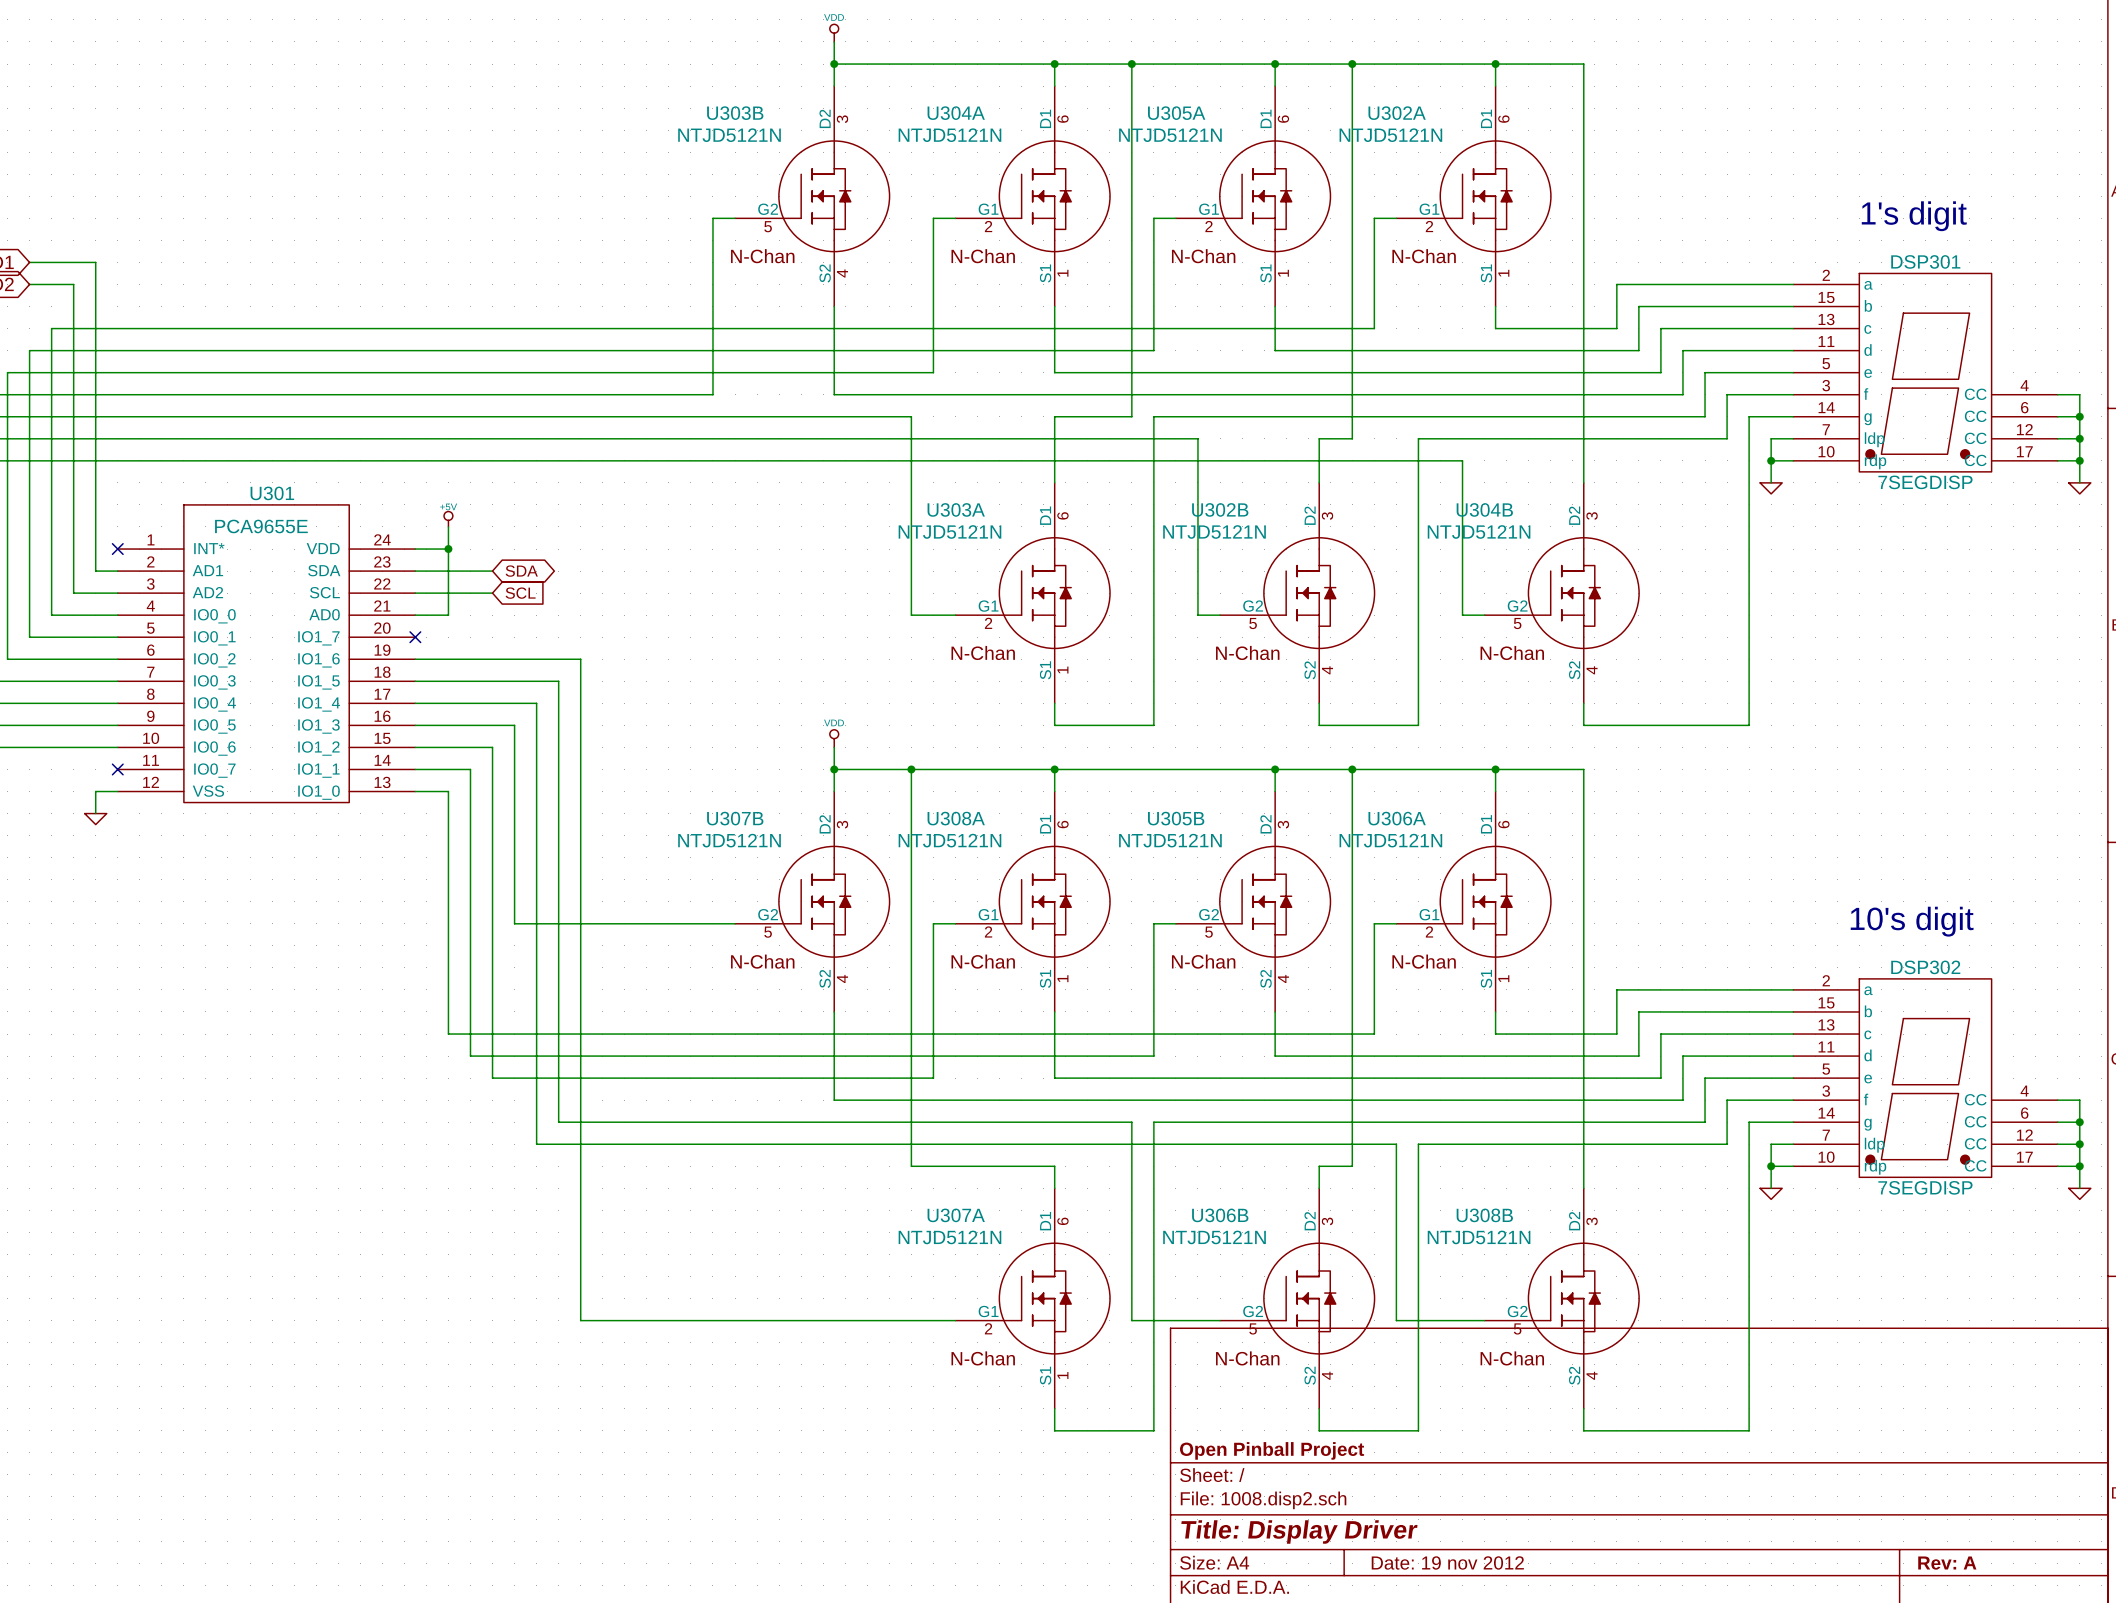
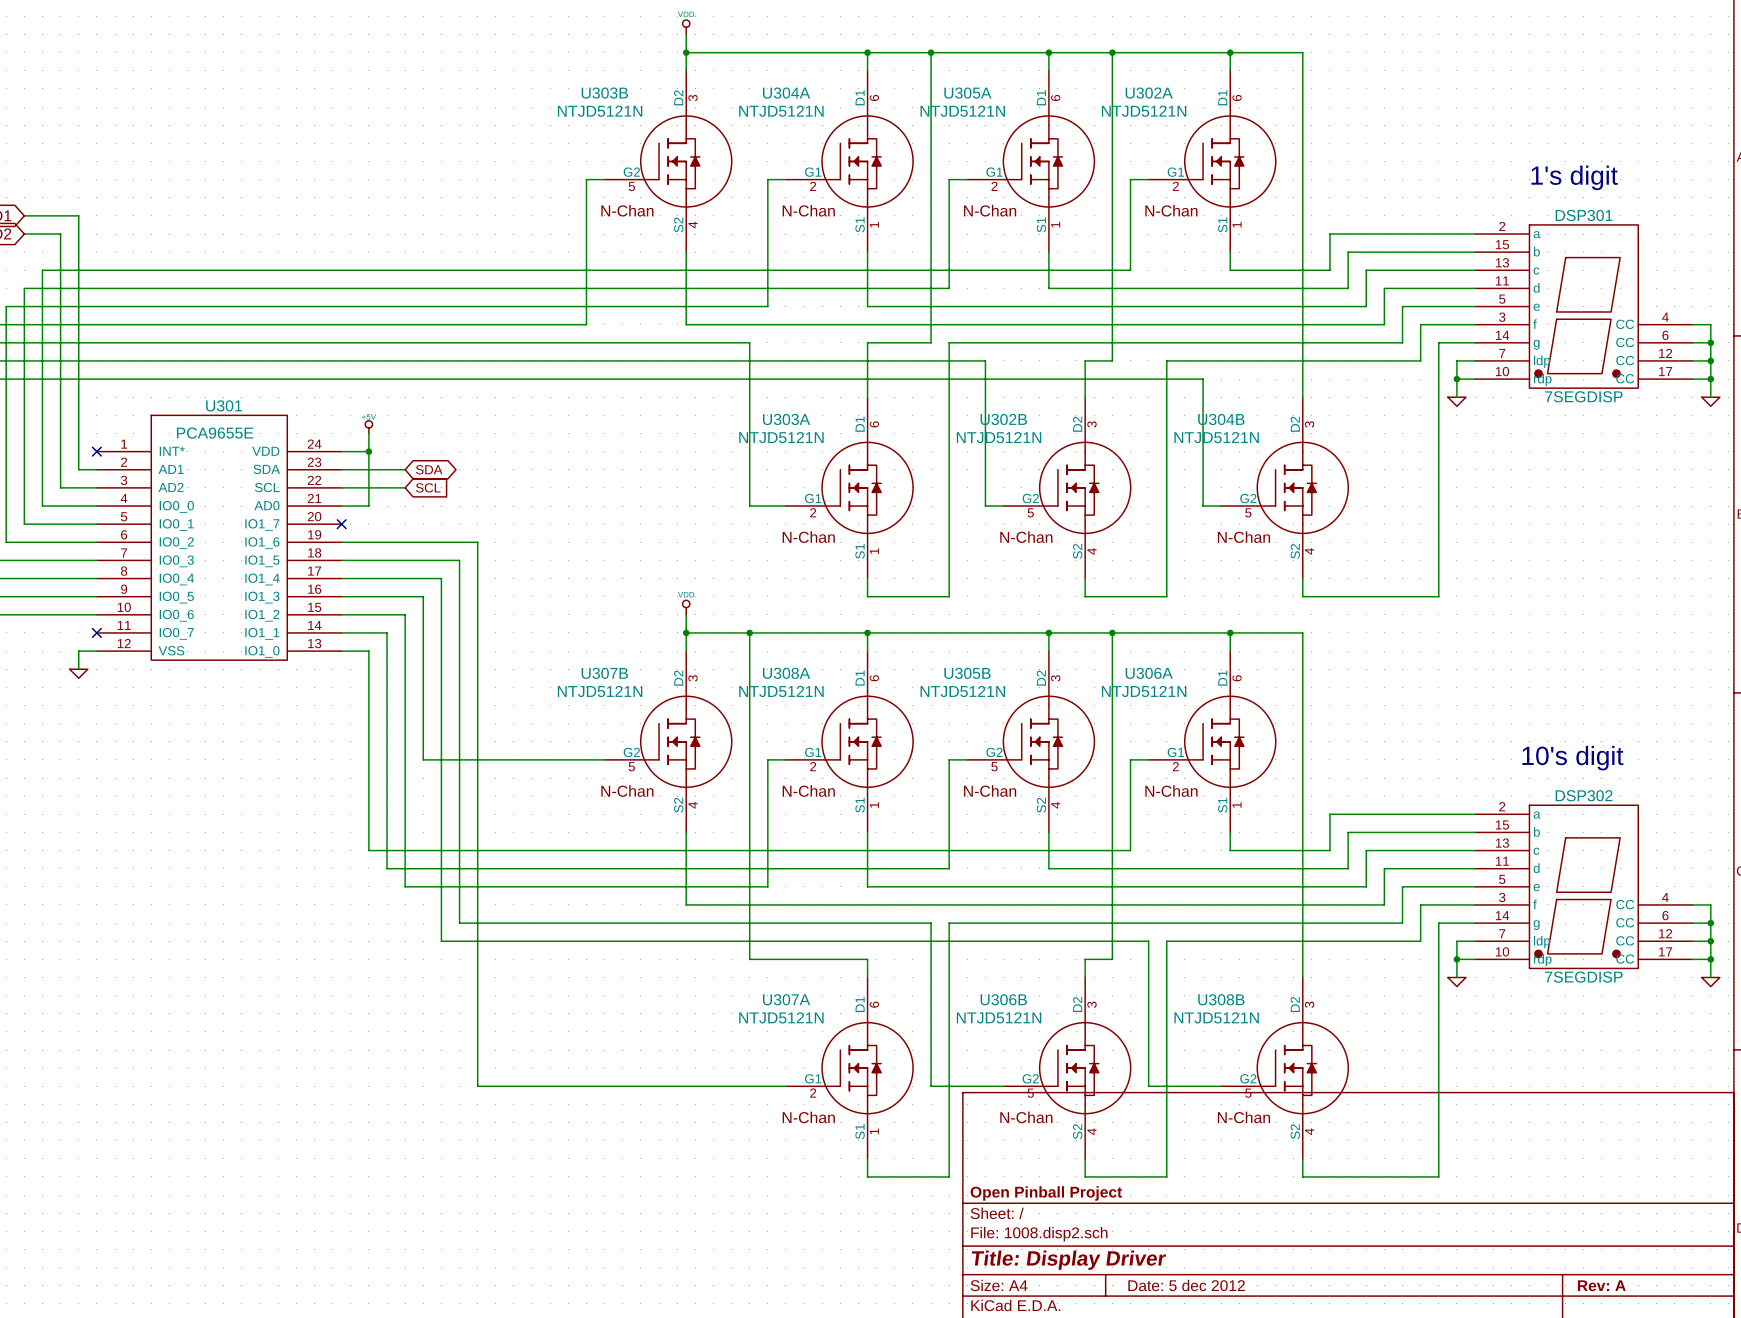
title block: Date: 19 nov 2012 (1447, 1562) -> Date: 5 dec 2012 (1186, 1285)

